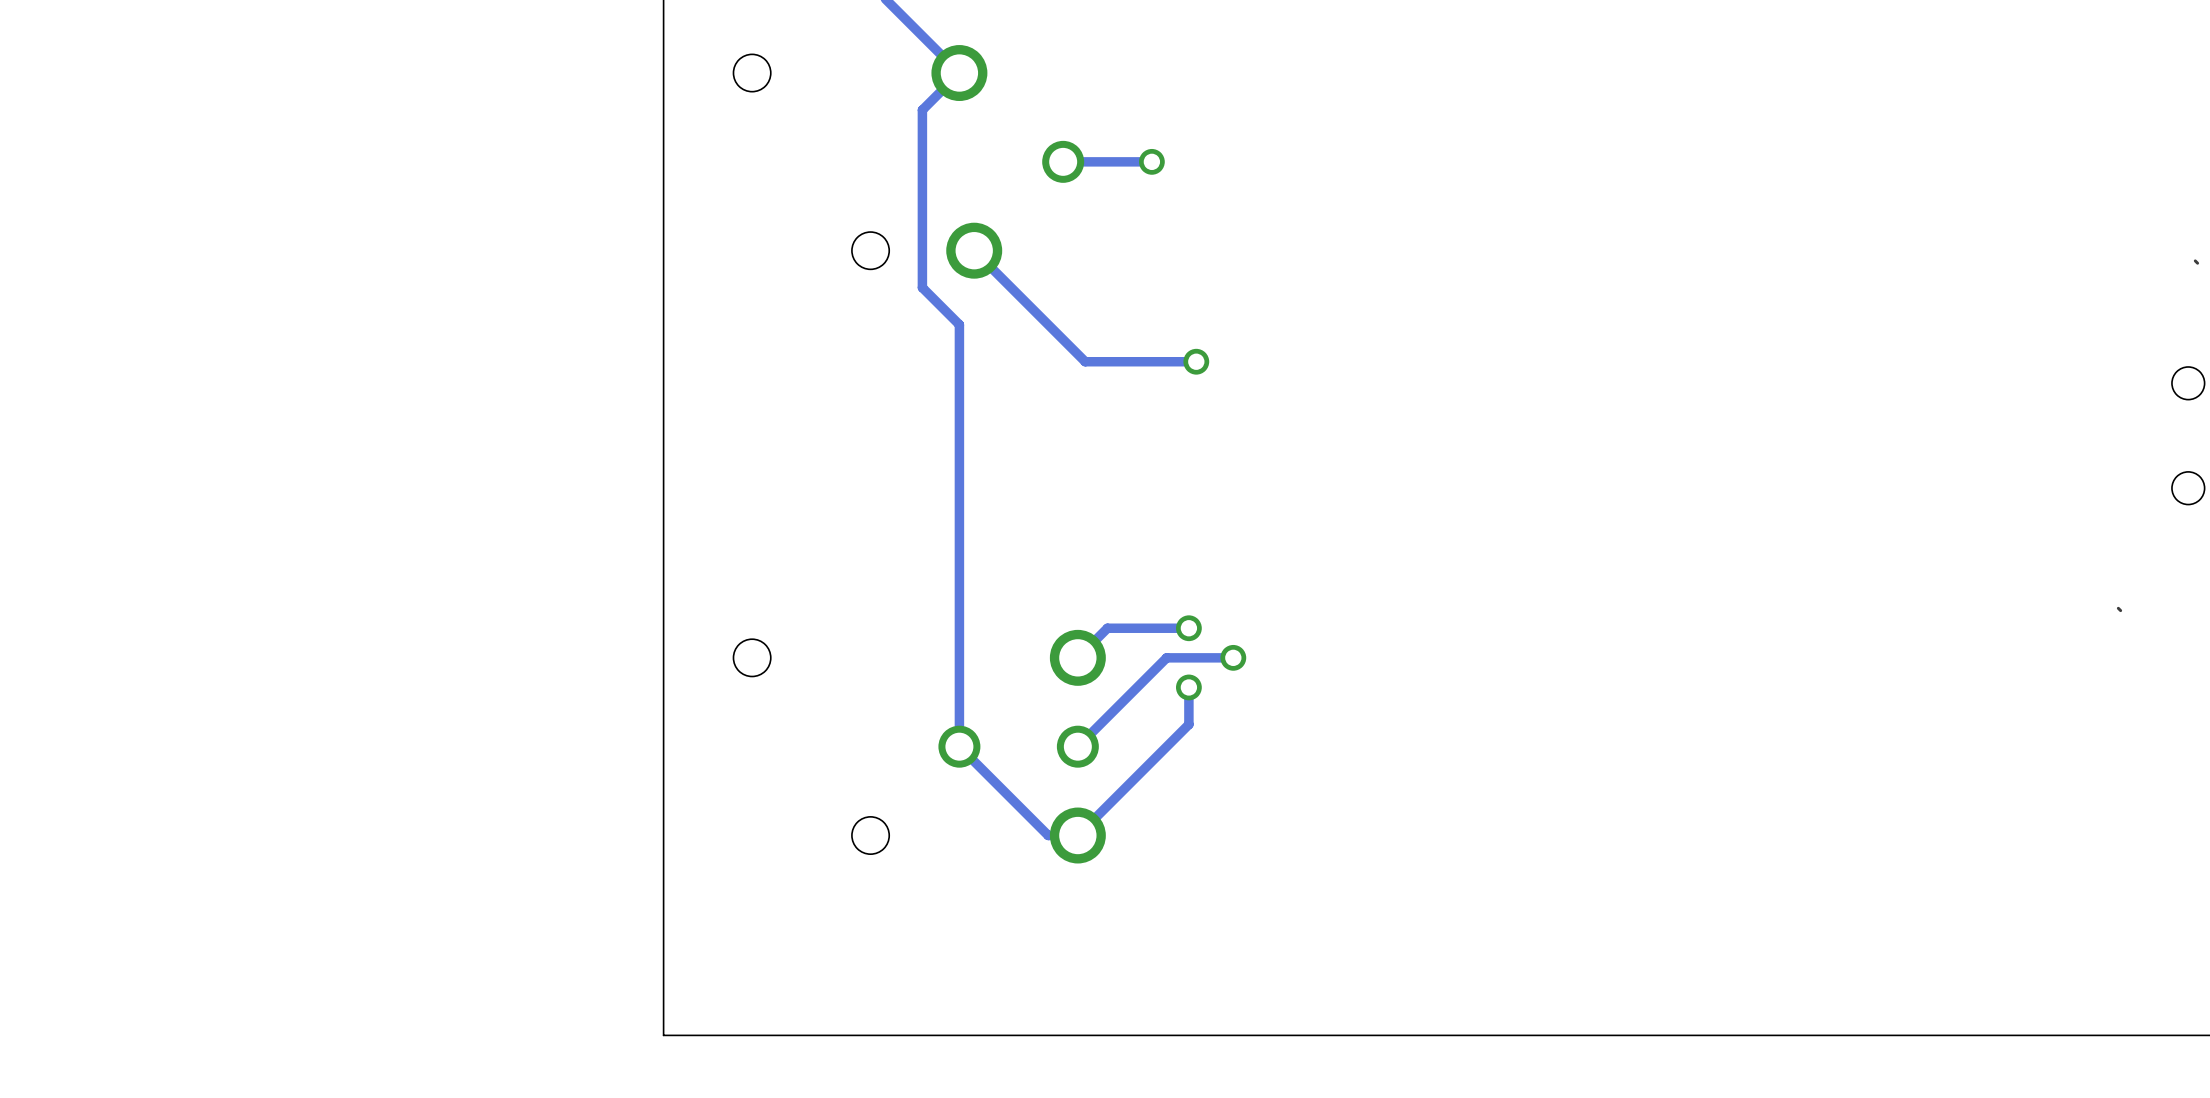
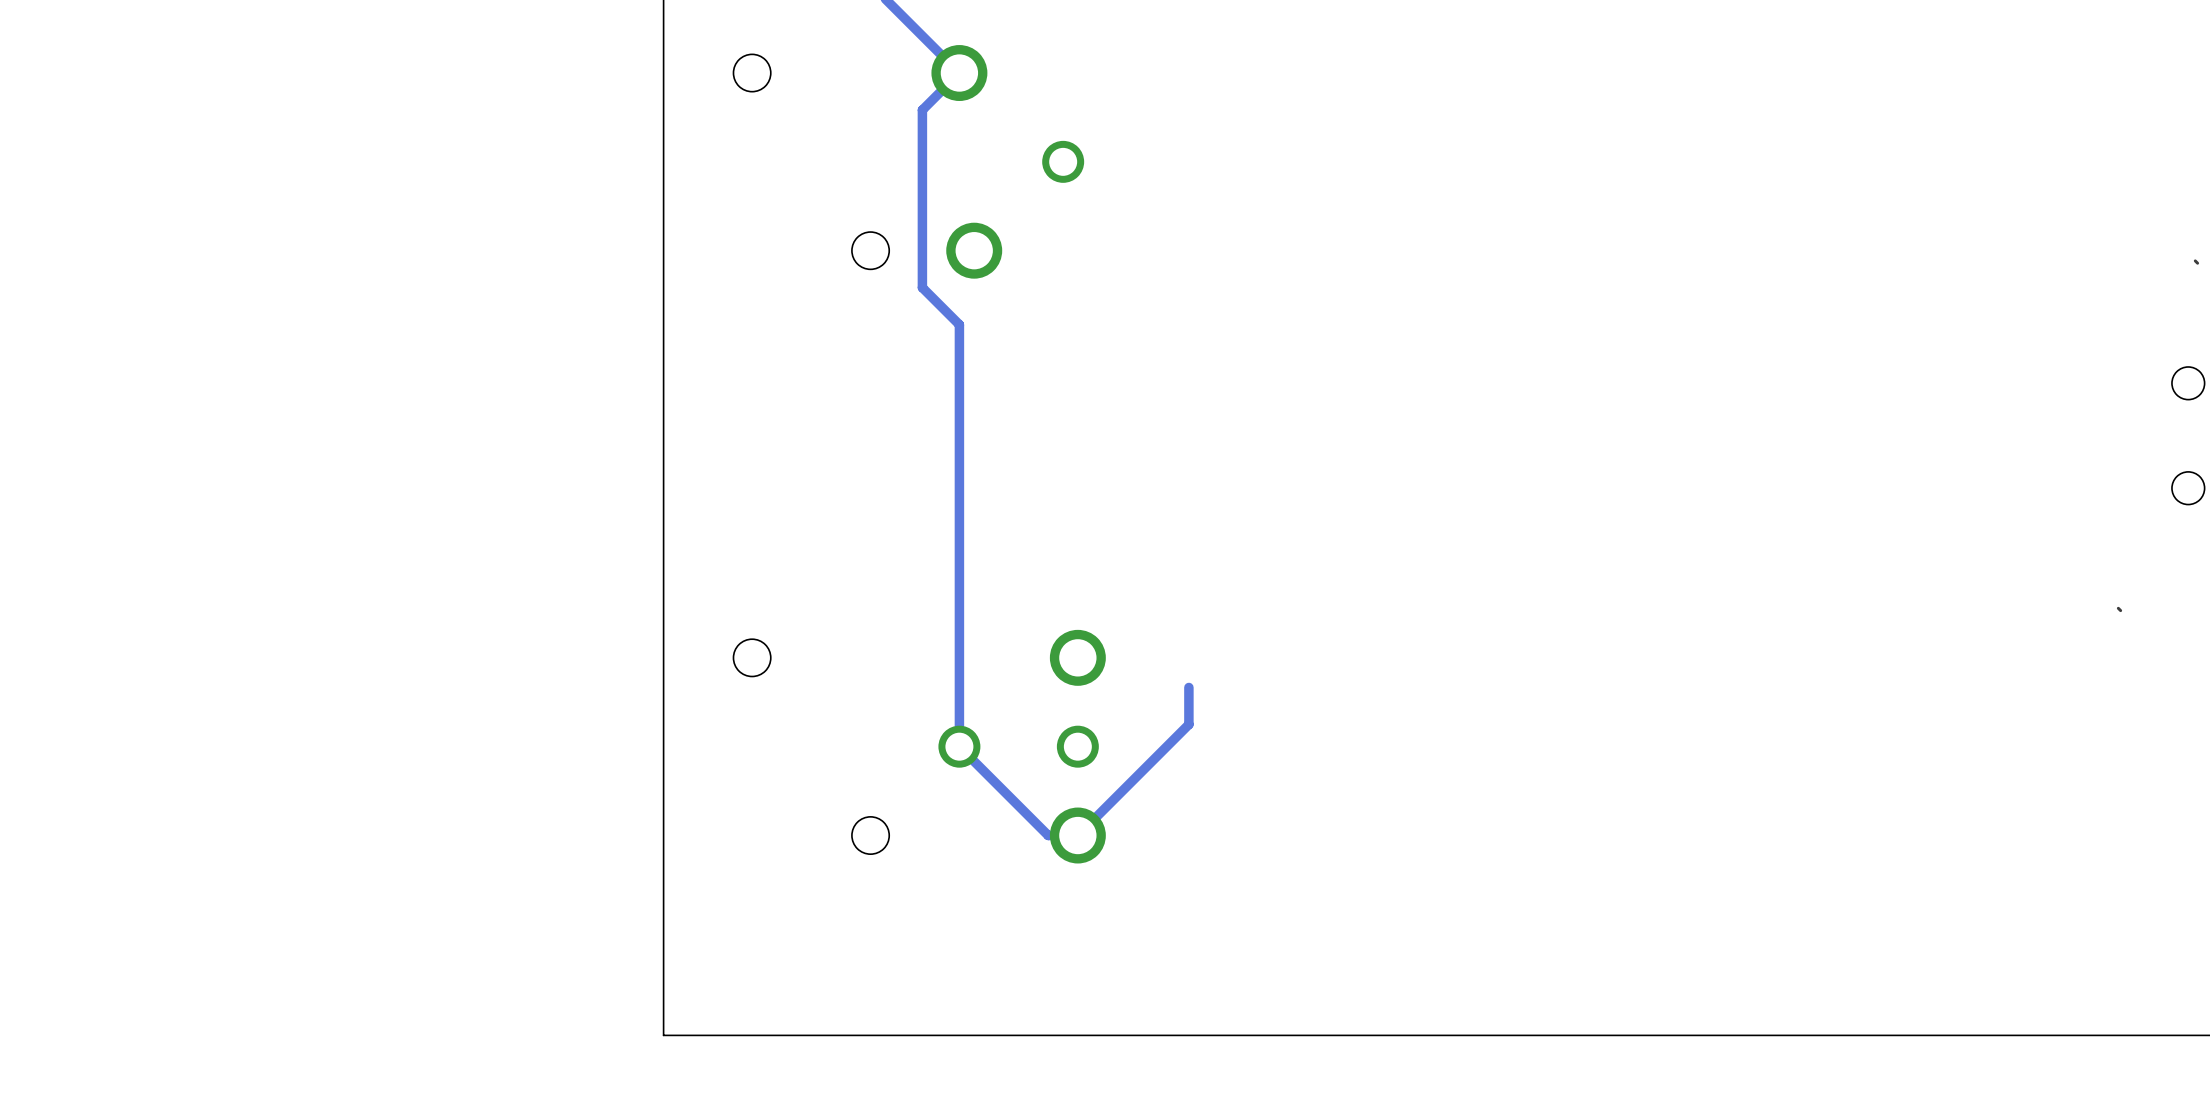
track: (1151, 161) (1063, 161) -> none
via: (1151, 161) -> none
track: (974, 250) (1085, 361) (1196, 361) -> none
via: (1196, 361) -> none
track: (1188, 628) (1107, 628) (1077, 657) -> none
via: (1188, 628) -> none
track: (1233, 657) (1166, 657) (1077, 746) -> none
via: (1233, 657) -> none
via: (1188, 687) -> none

